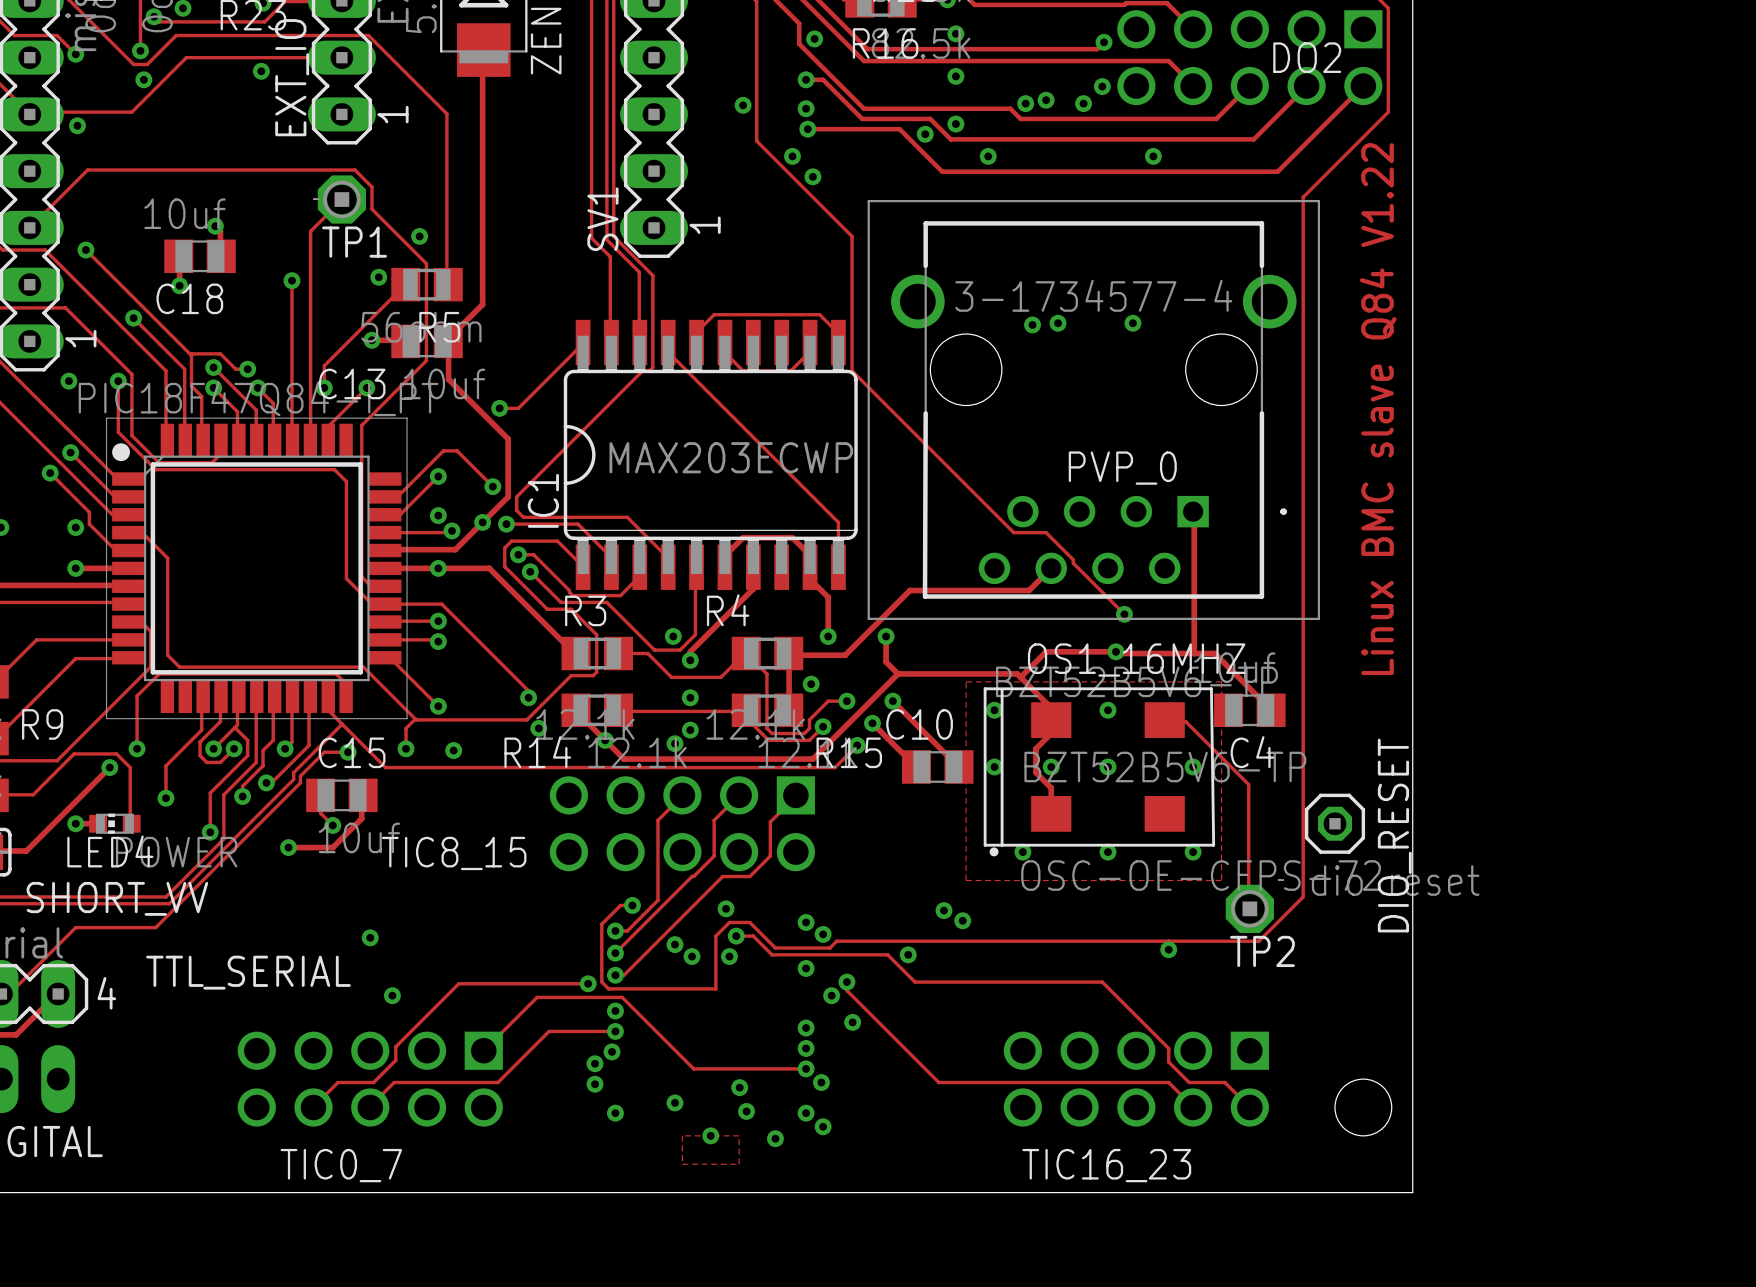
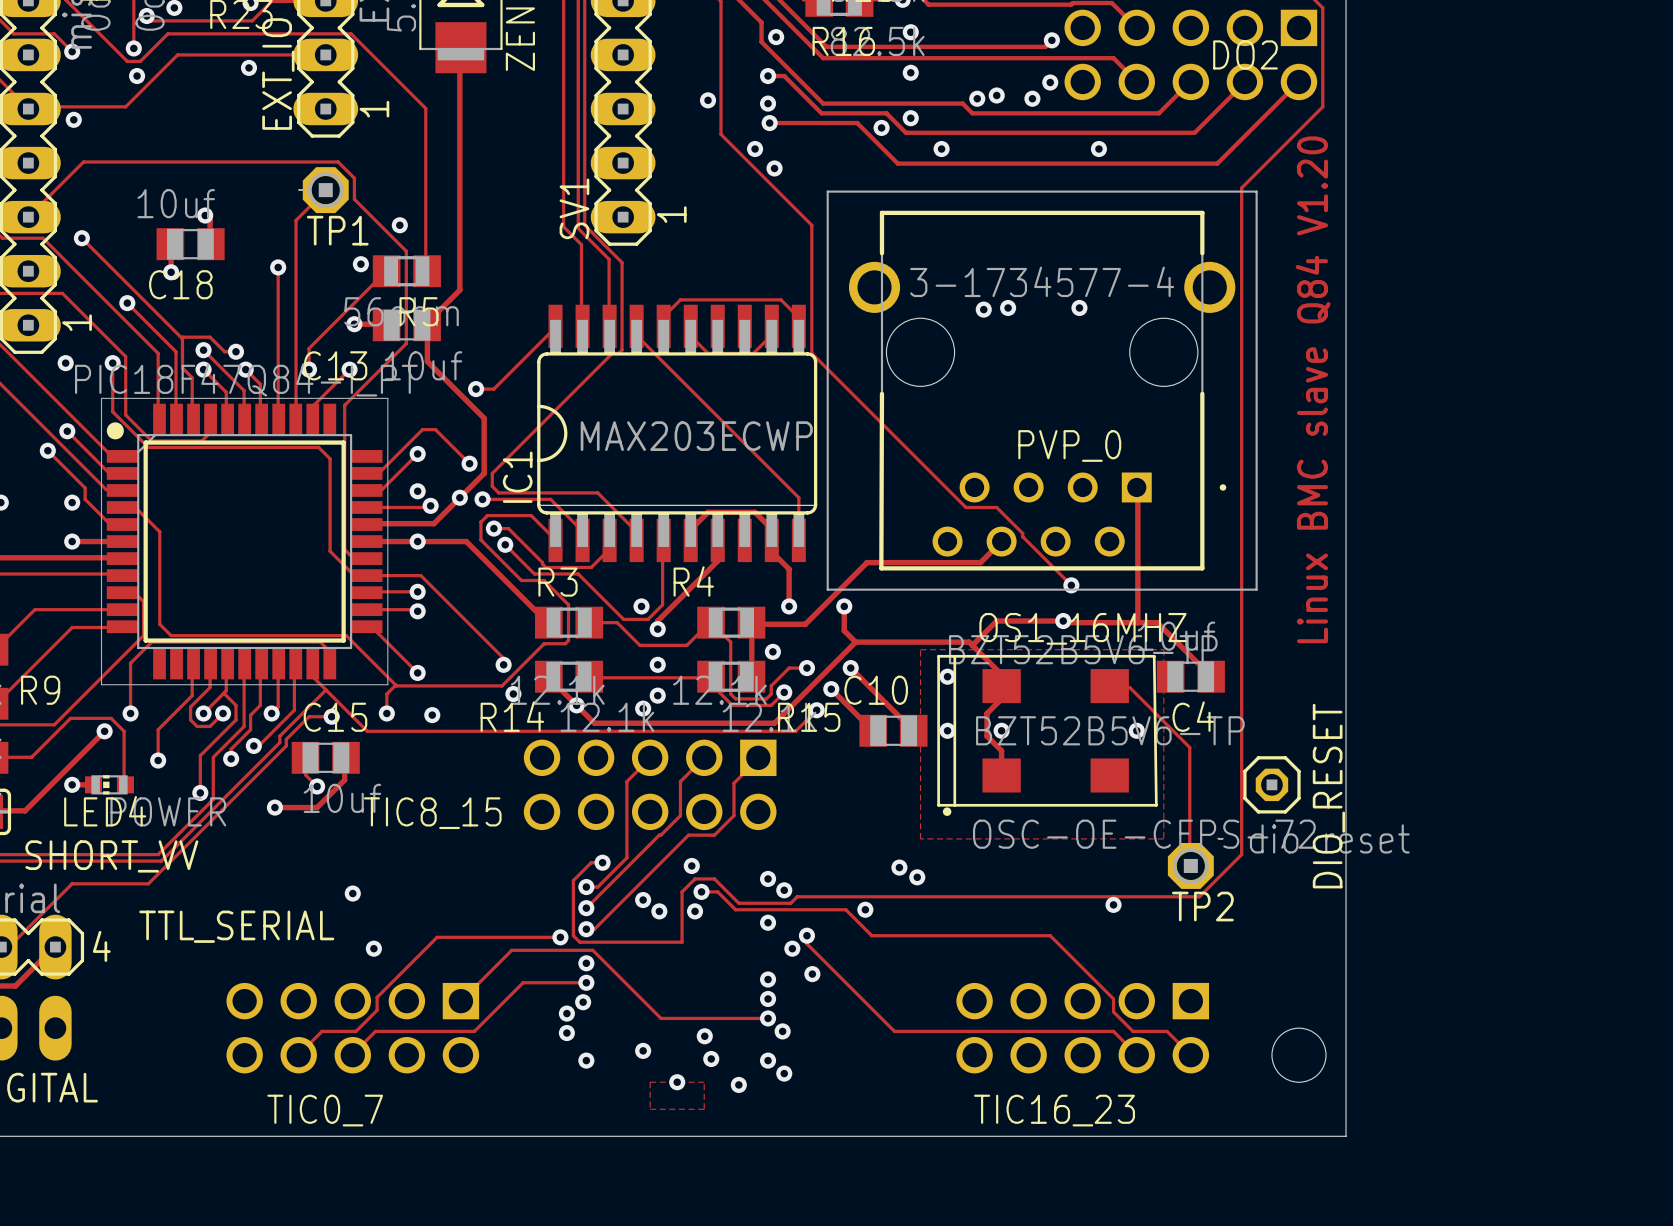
text: Linux BMC slave Q84 V1.22 (1378, 409) -> Linux BMC slave Q84 V1.20 (1313, 389)
via: (1107, 710) -> none
via: (1107, 767) -> none
via: (1022, 852) -> none
via: (1107, 852) -> none
via: (1193, 852) -> none

